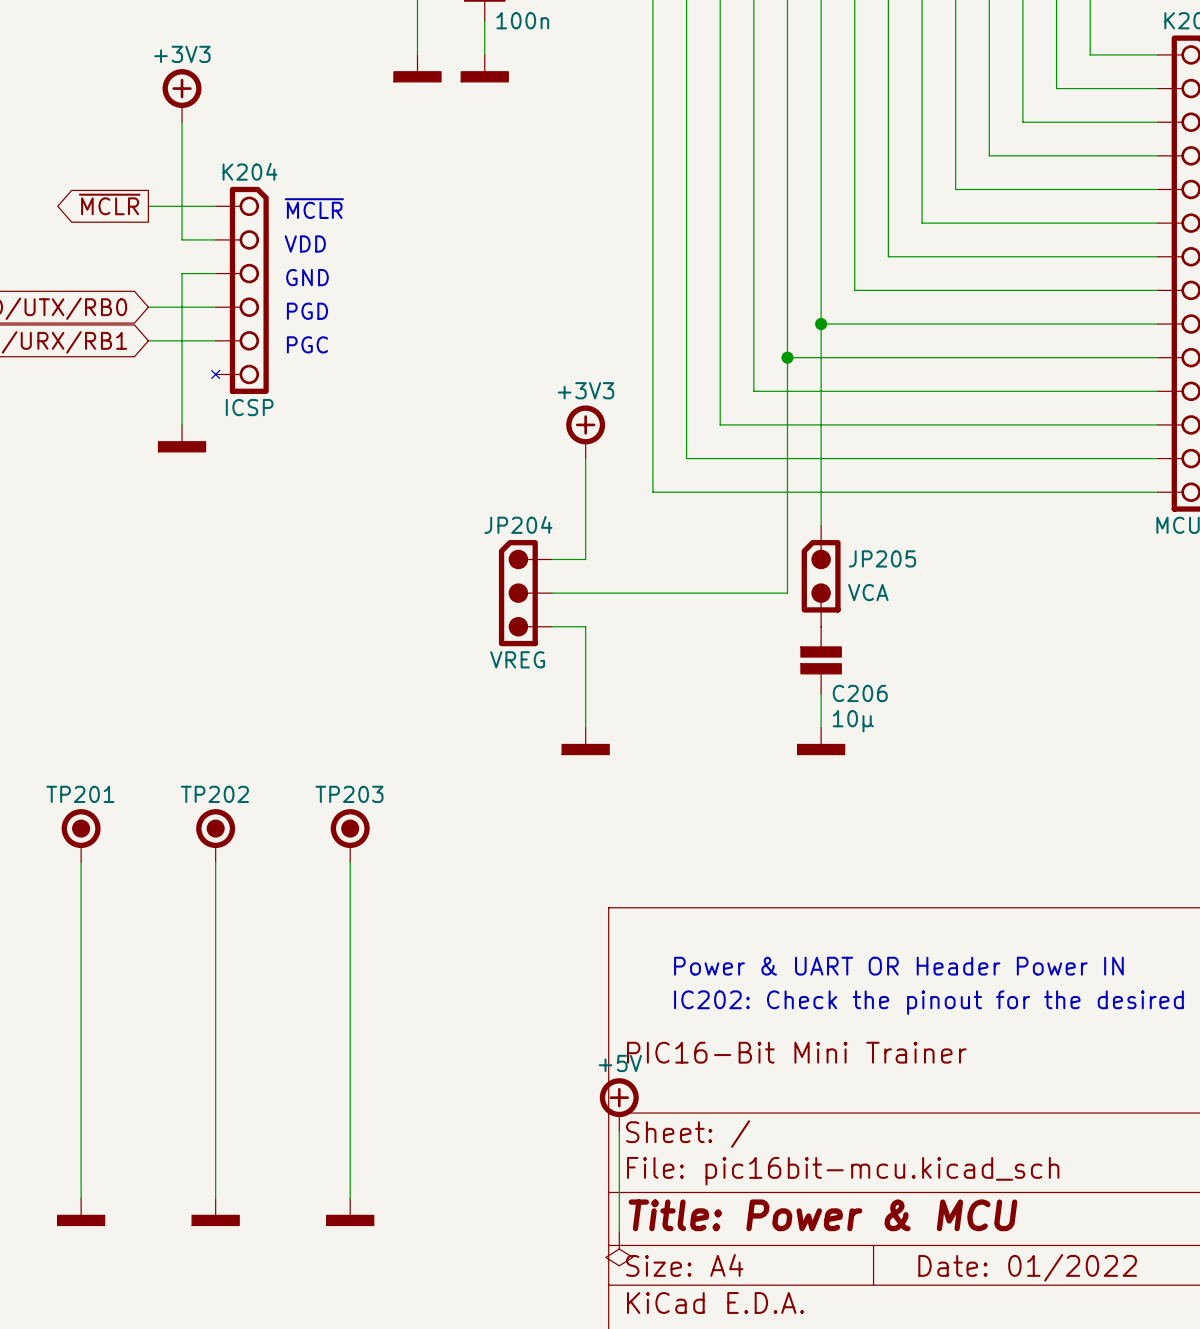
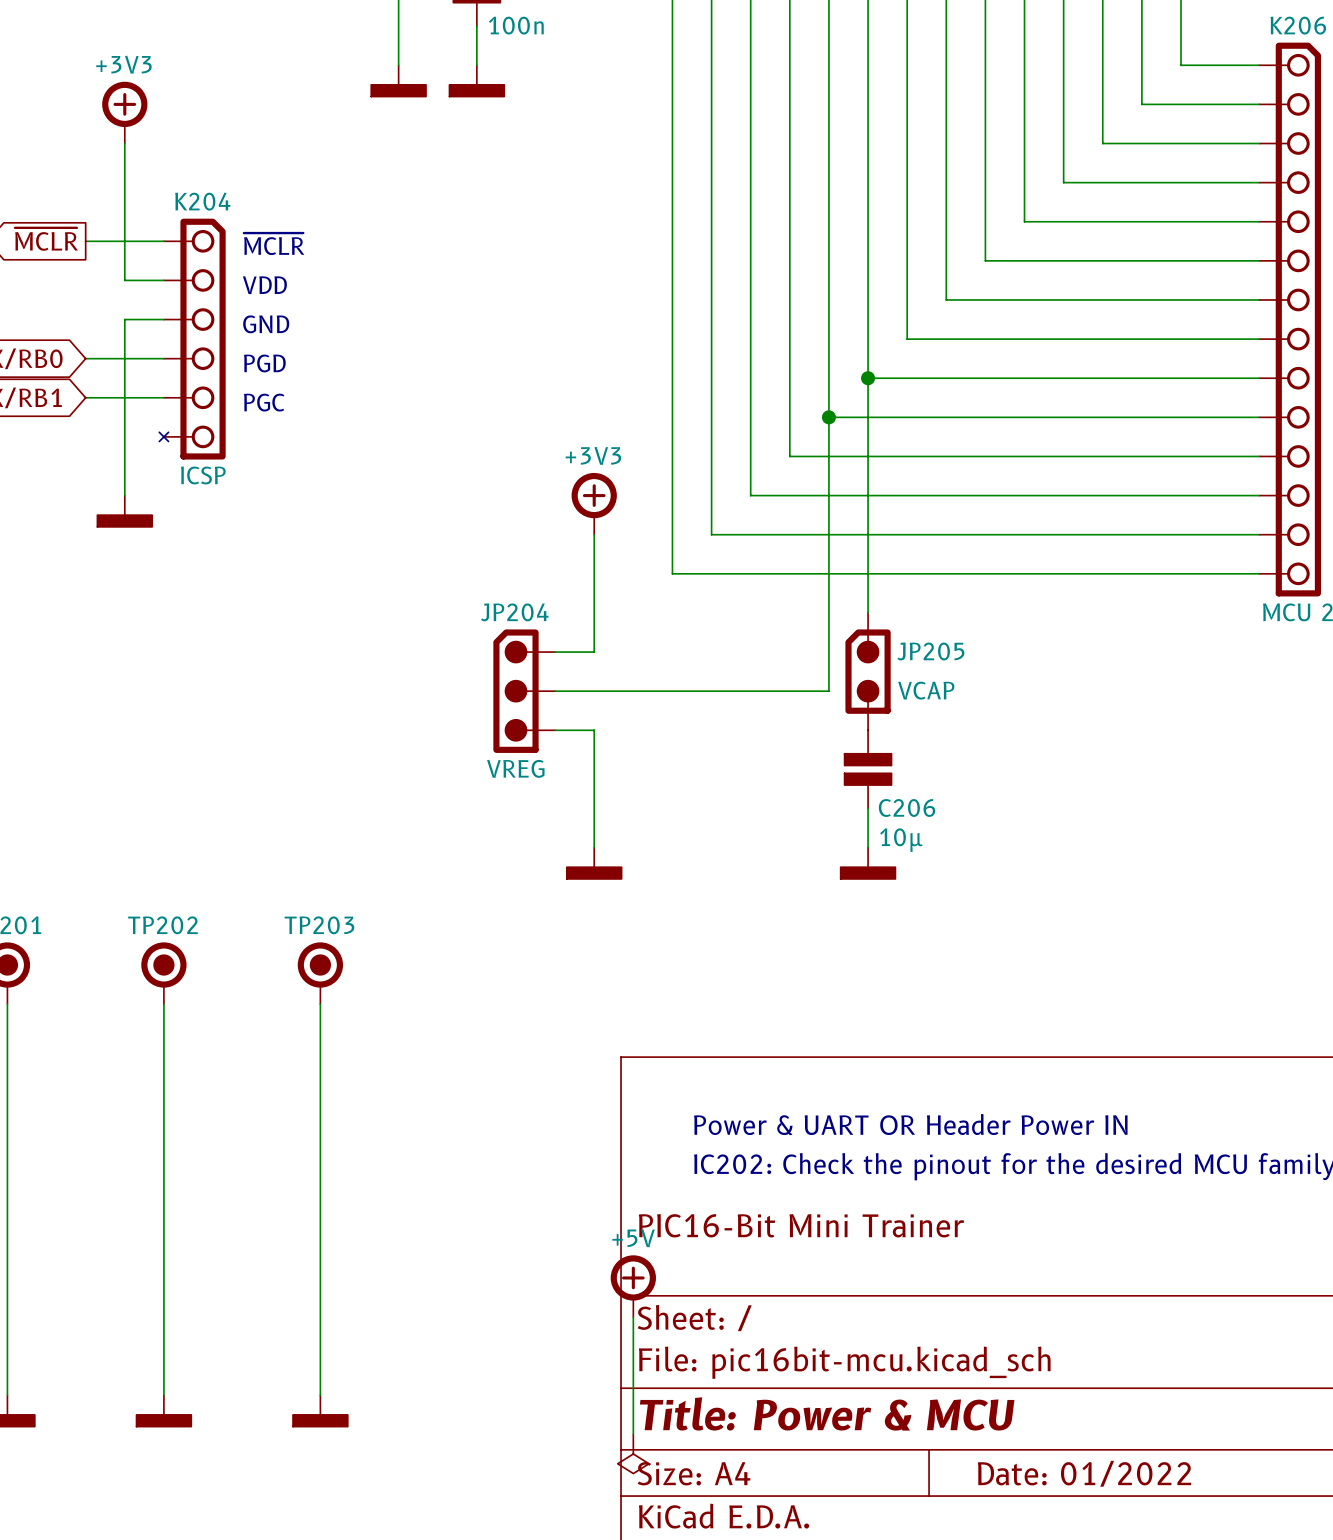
JP205 value: VCA (868, 592) -> VCAP (926, 690)

